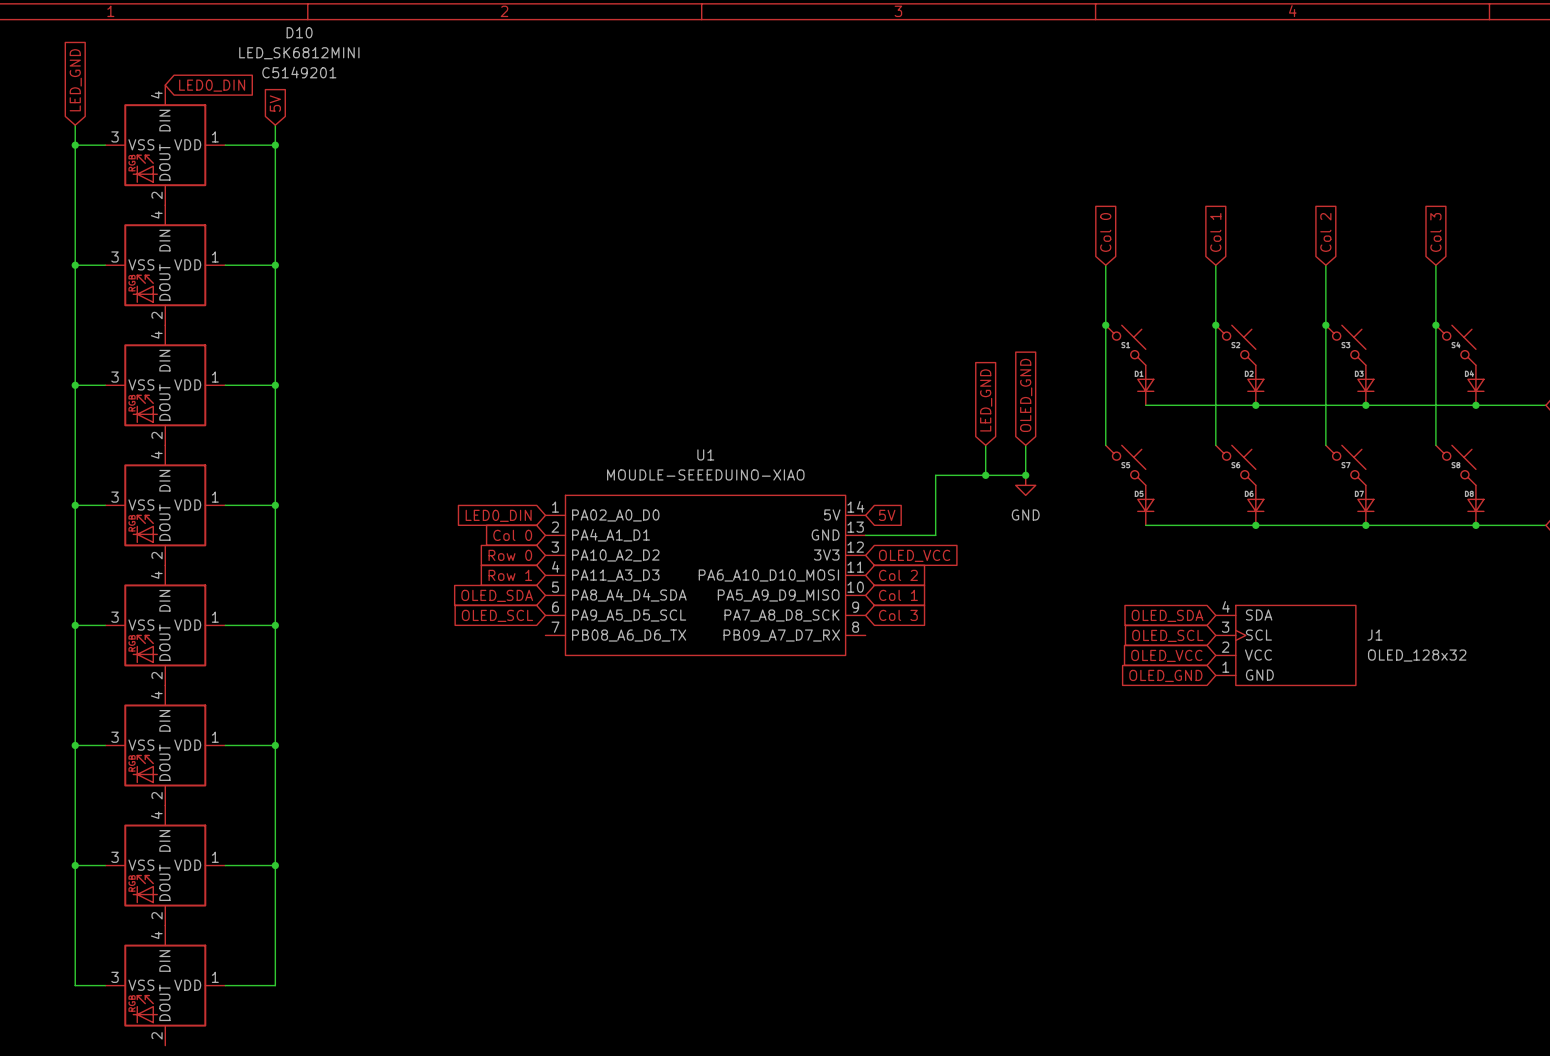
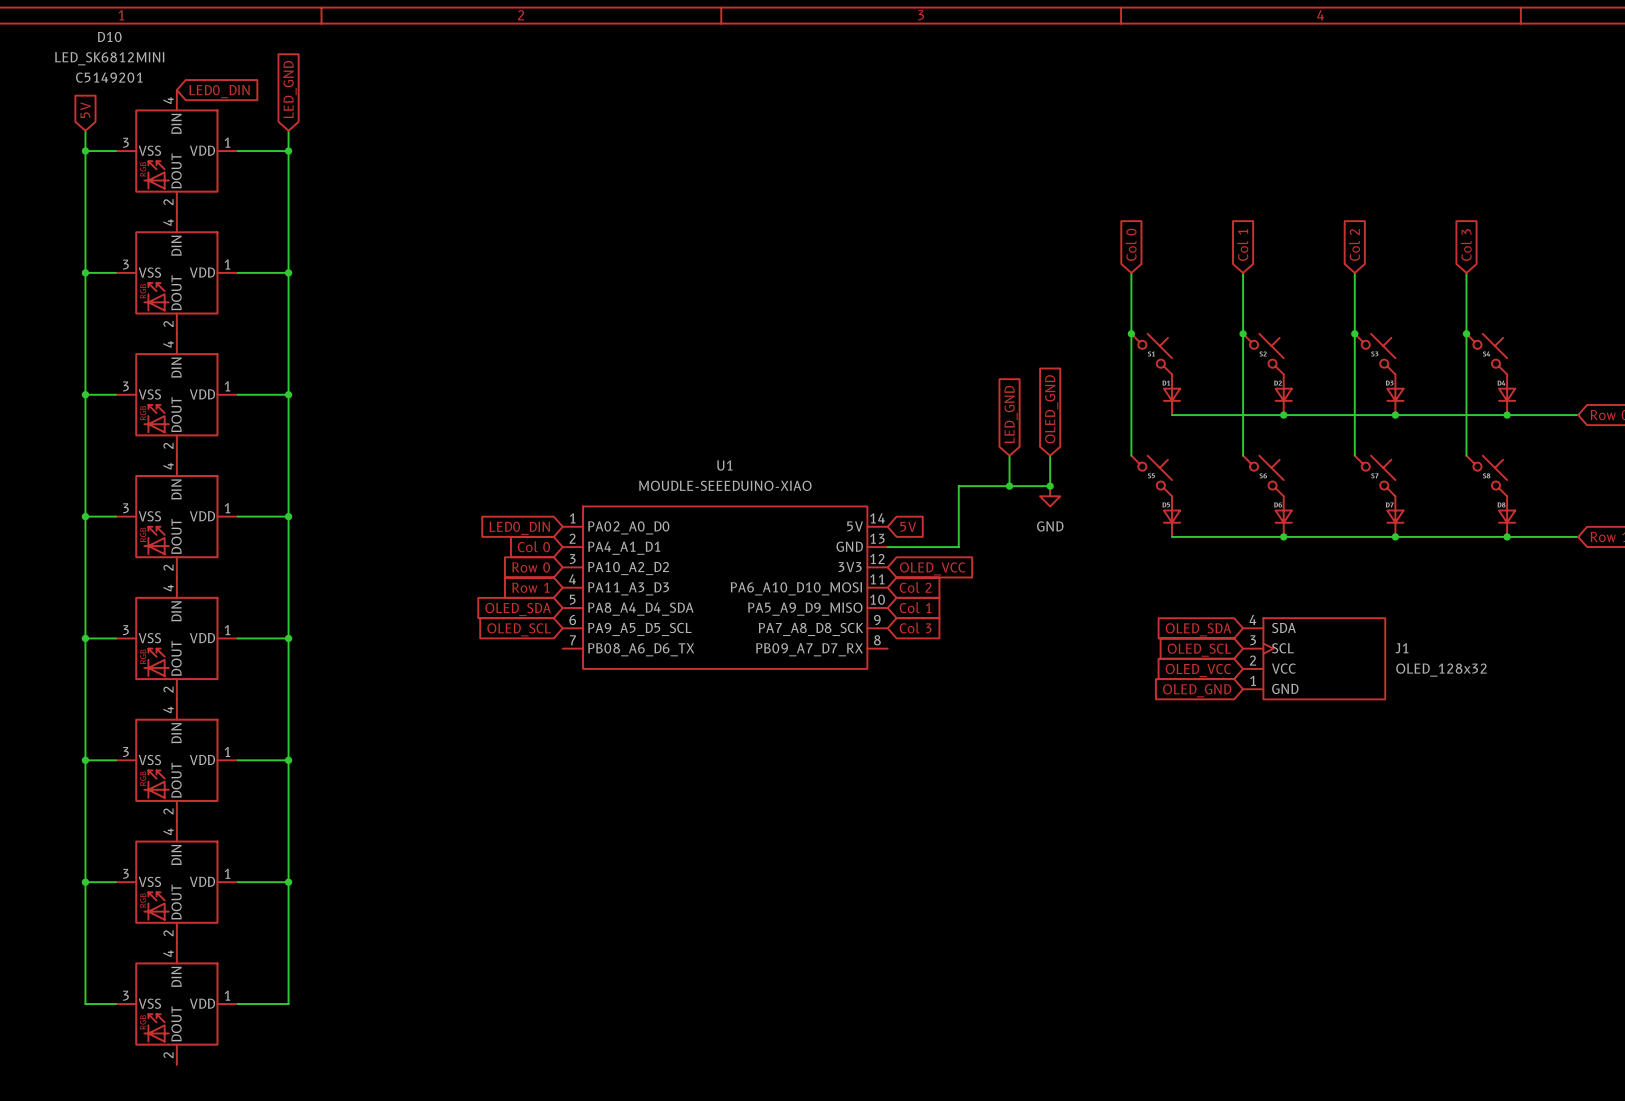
D10 name position: D10 (299, 32) -> D10 (109, 36)
D10 value position: LED_SK6812MINI (299, 53) -> LED_SK6812MINI (109, 58)
D10 text position: C5149201 (299, 72) -> C5149201 (109, 77)
global label: LED_GND (75, 80) -> 5V (85, 110)
global label: 5V (275, 103) -> LED_GND (290, 89)

